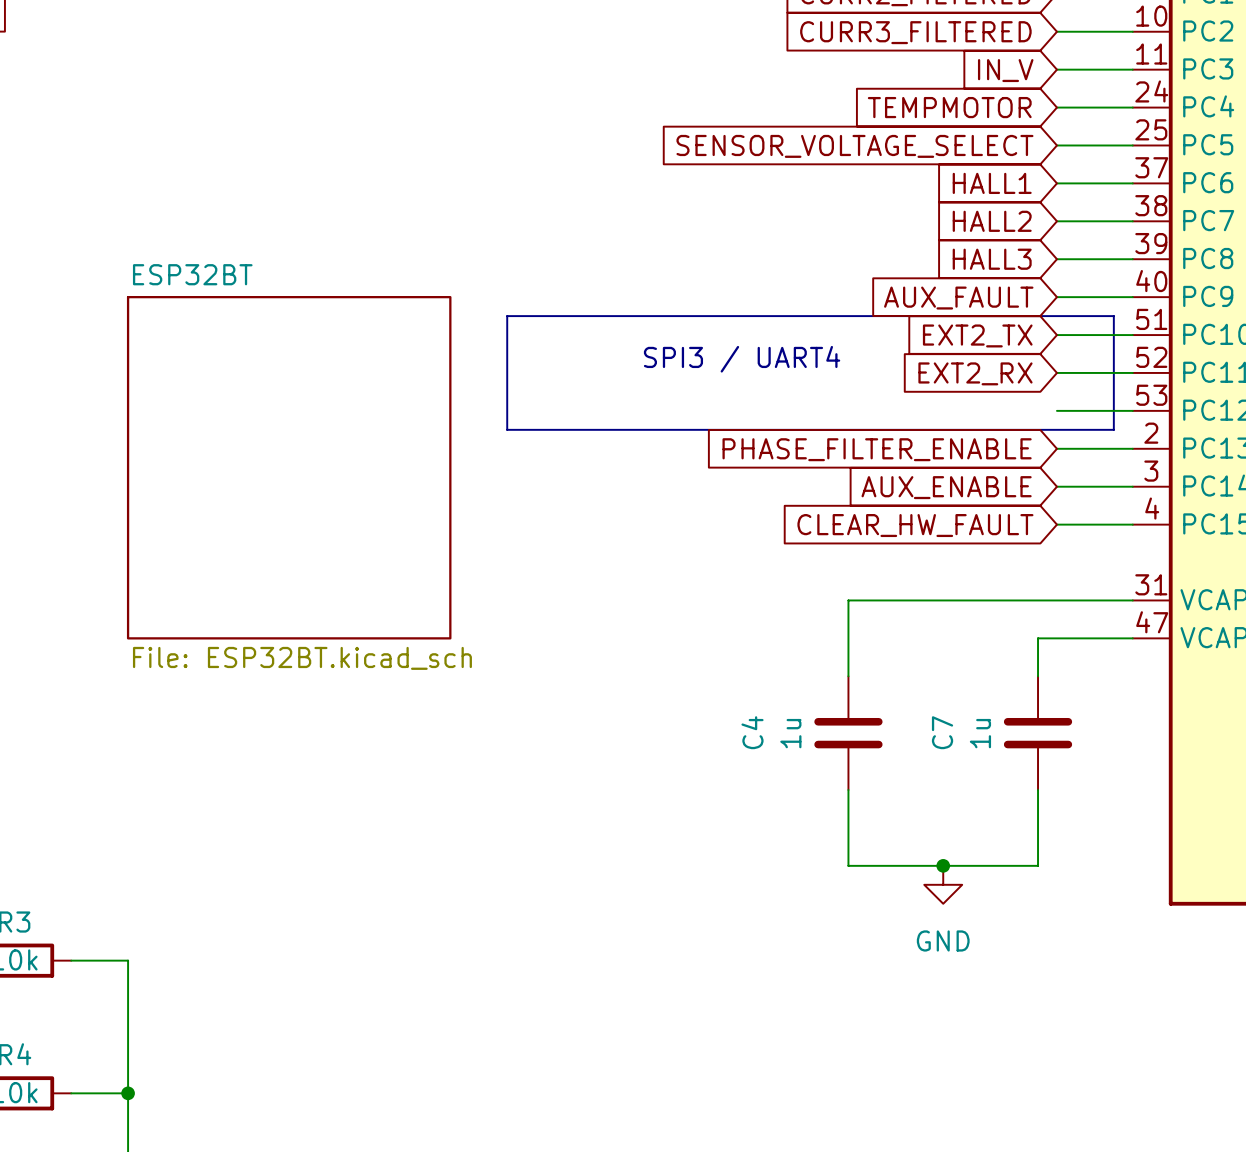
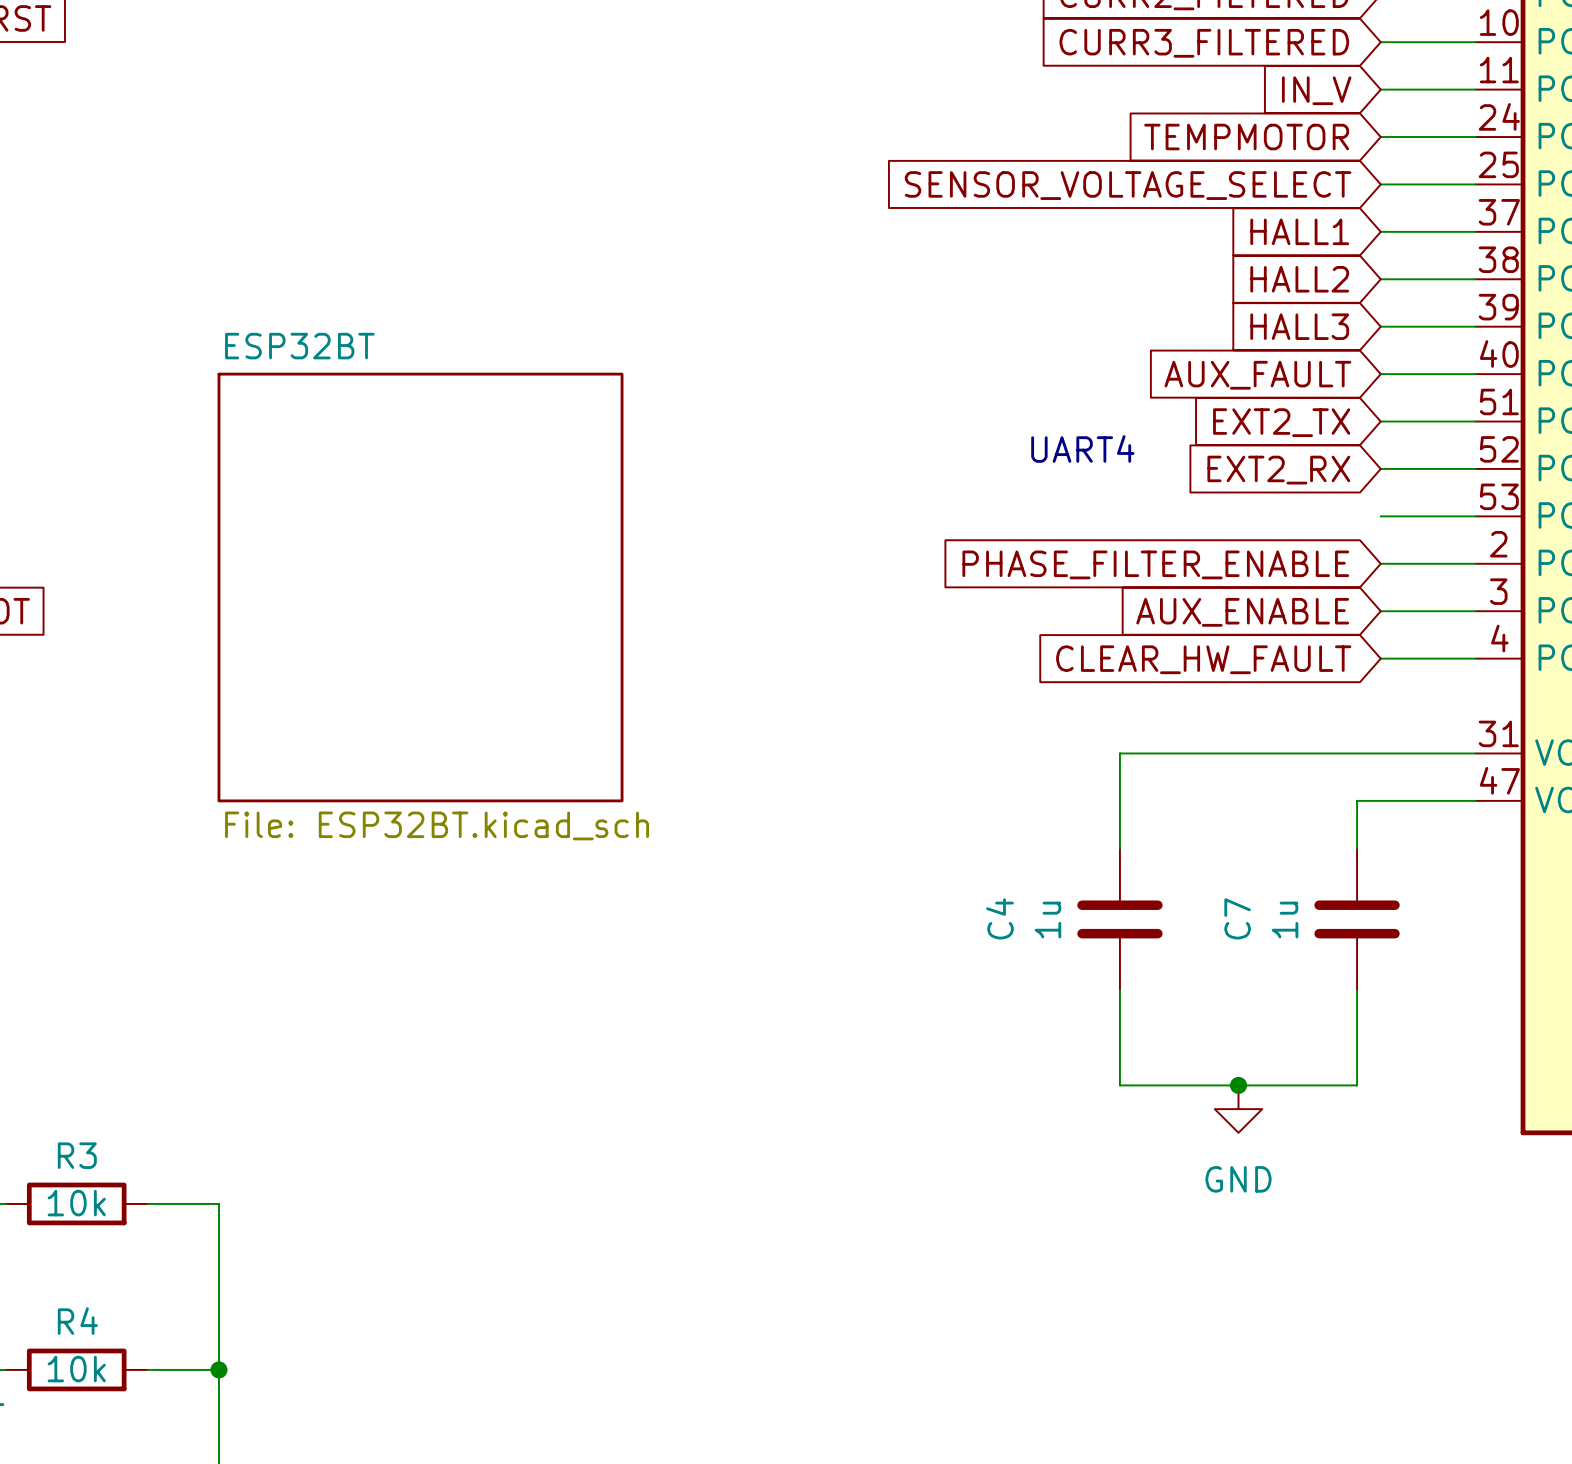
line: (507, 316) (1113, 316) (1113, 429) (507, 429) (507, 316) -> none
text: none -> UART4 (1082, 448)
text: SPI3 / UART4 (742, 359) -> none

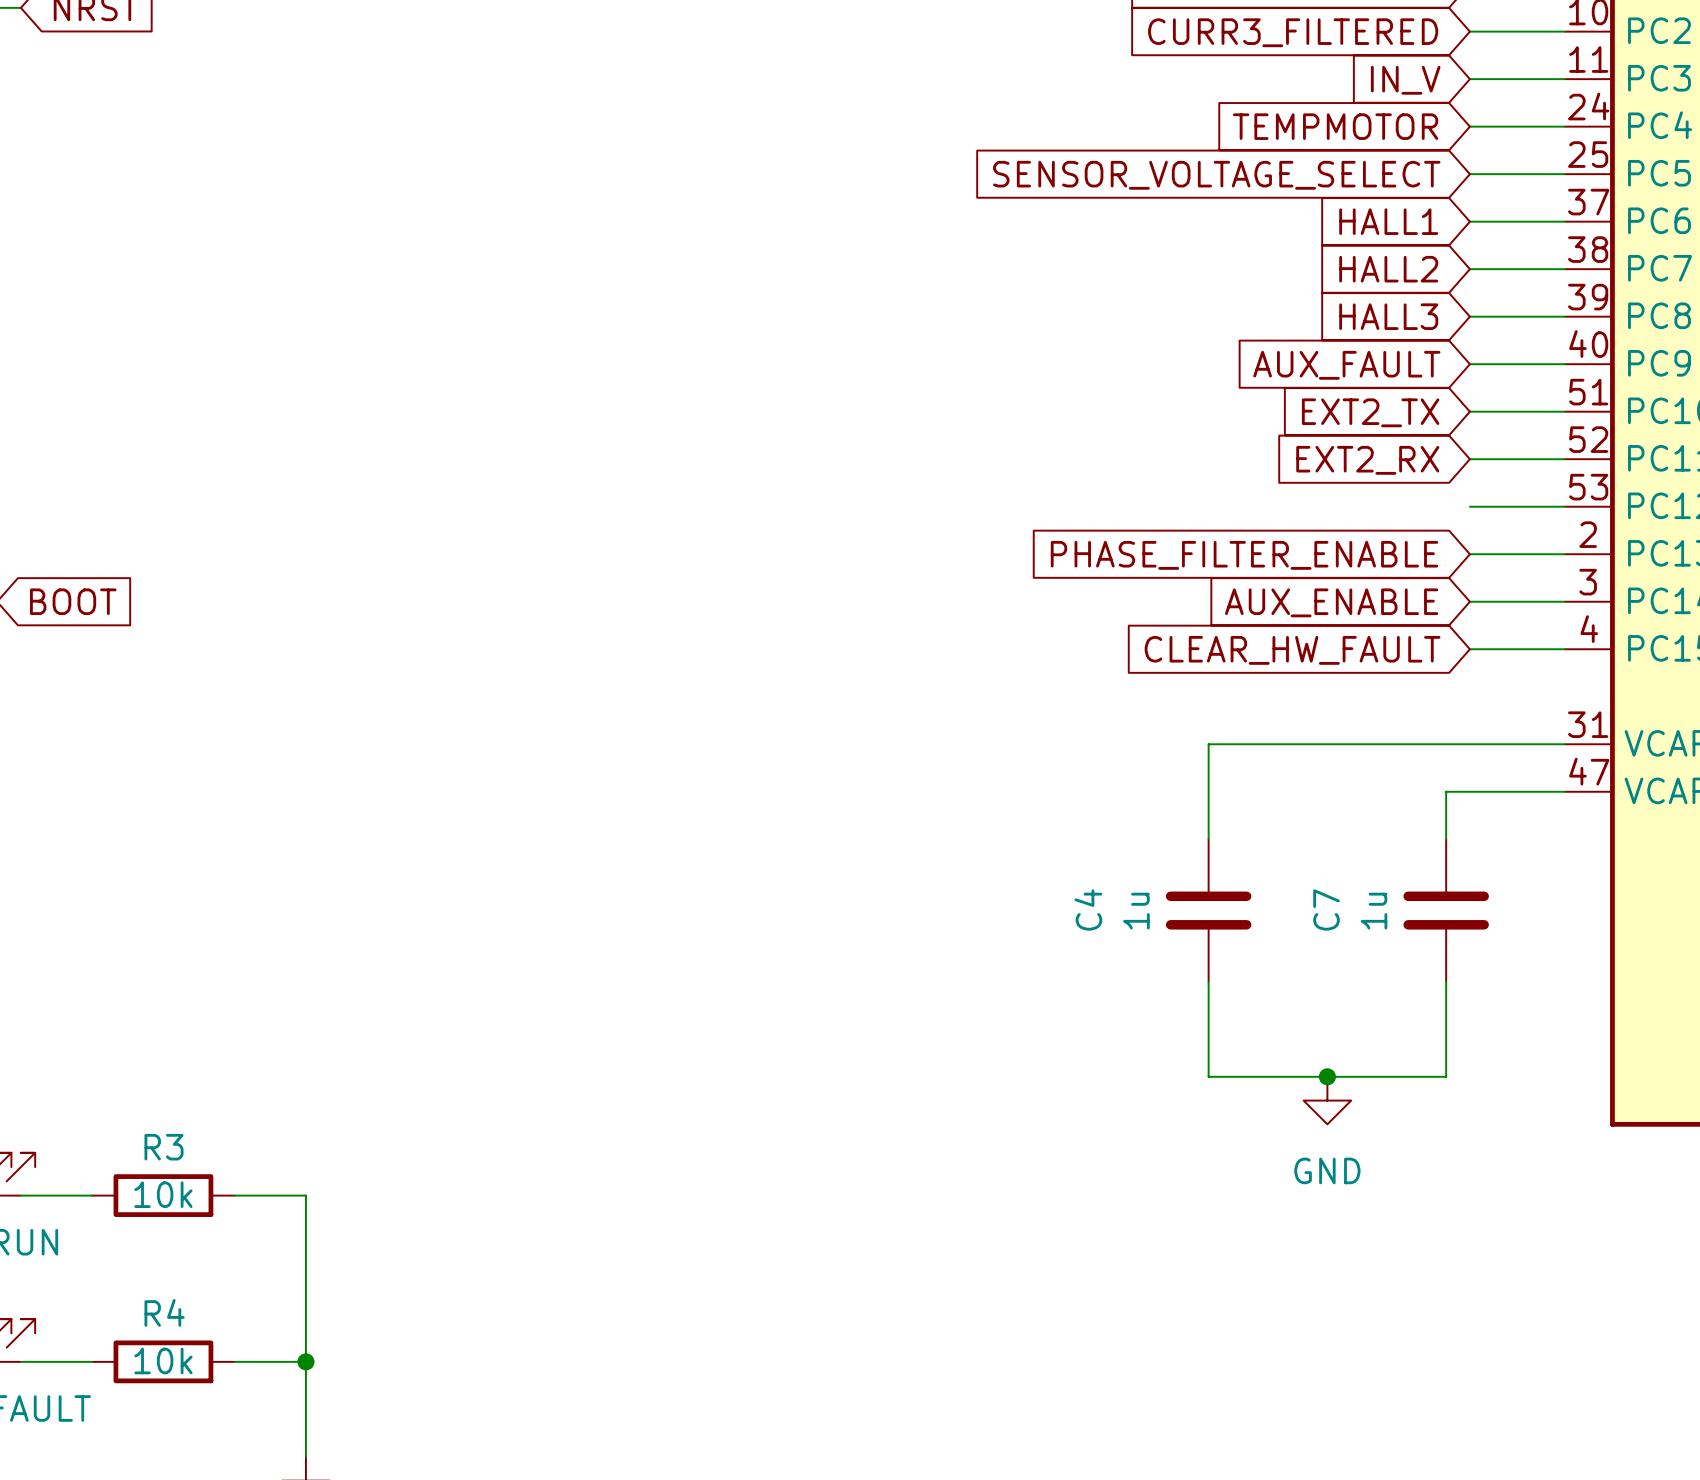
text: UART4 (1082, 448) -> none
sheet ESP32BT: File: ESP32BT.kicad_sch (420, 587) -> none

